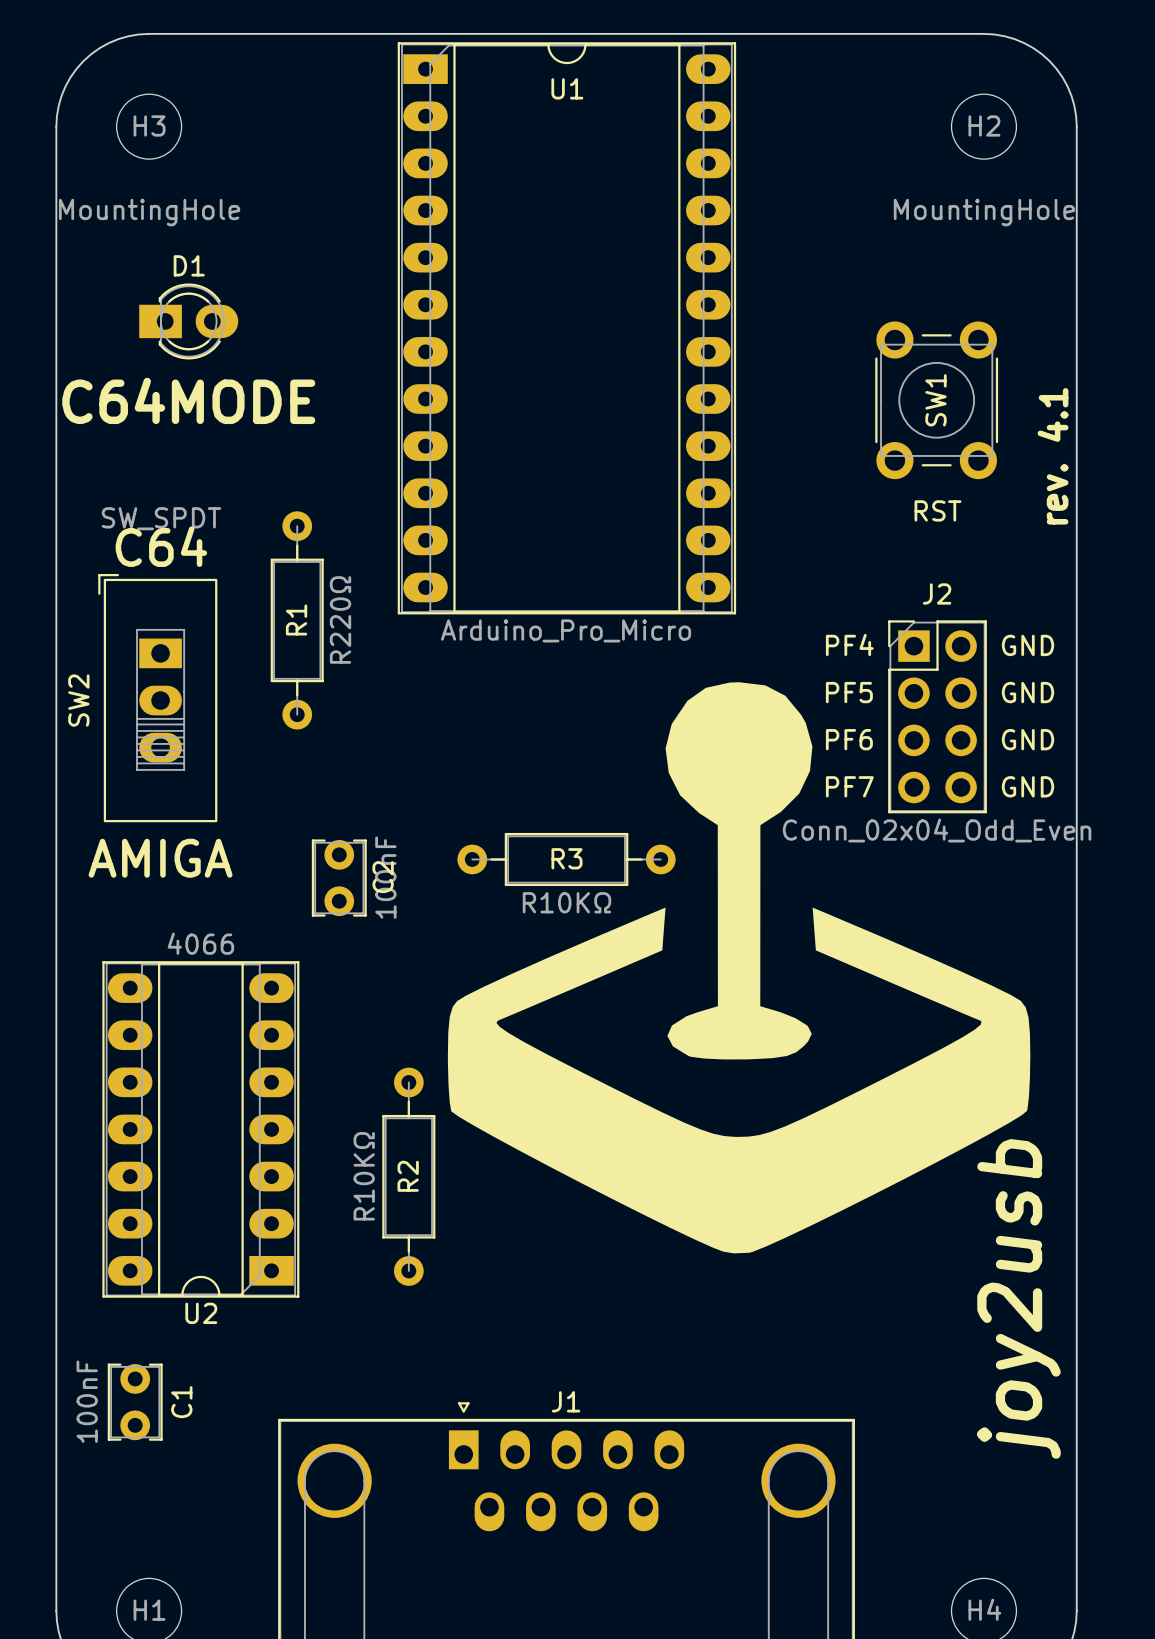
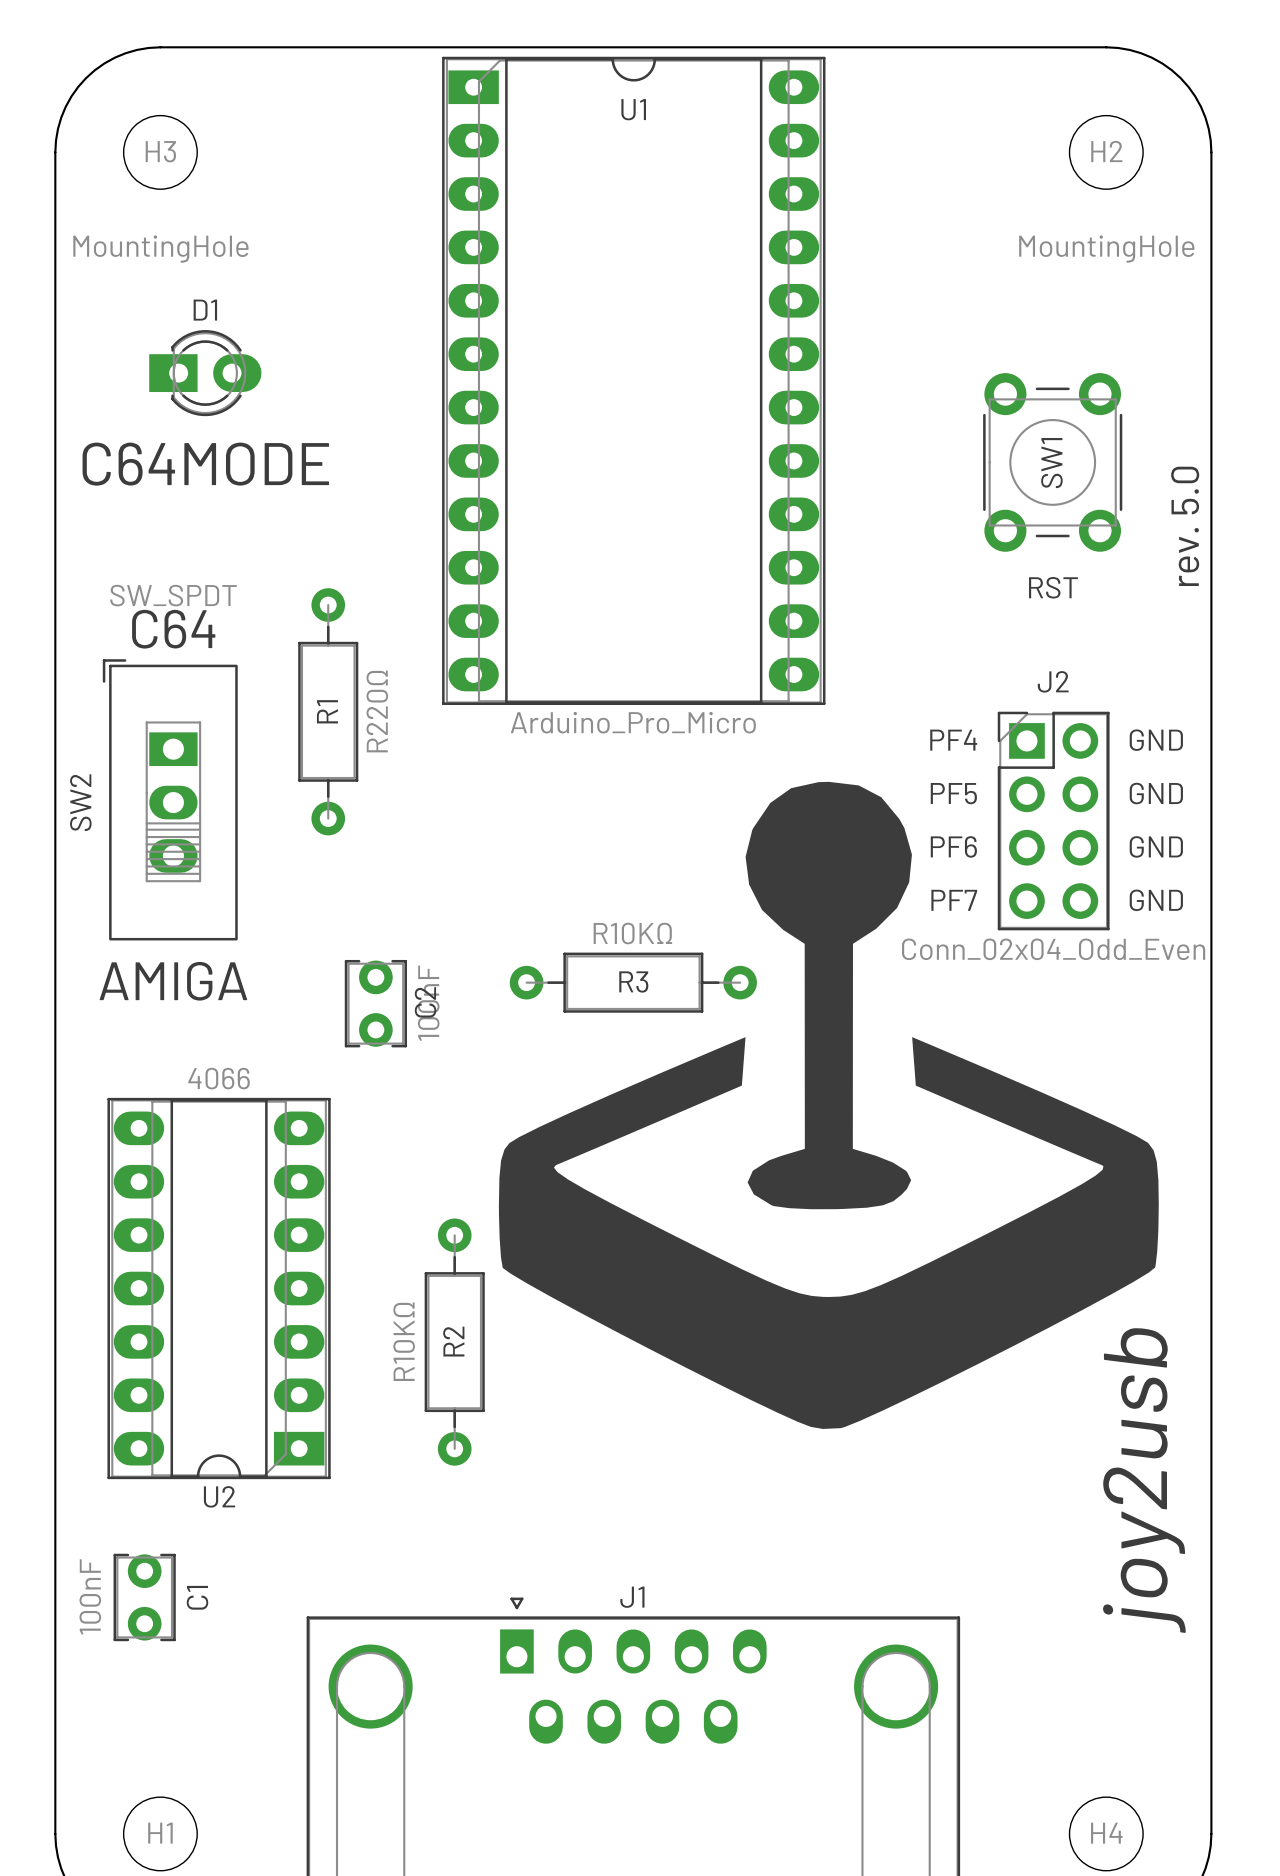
text: rev. 4.1 (1053, 456) -> rev. 5.0 (1185, 526)
R3 value position: R10KΩ (566, 902) -> R10KΩ (632, 933)

